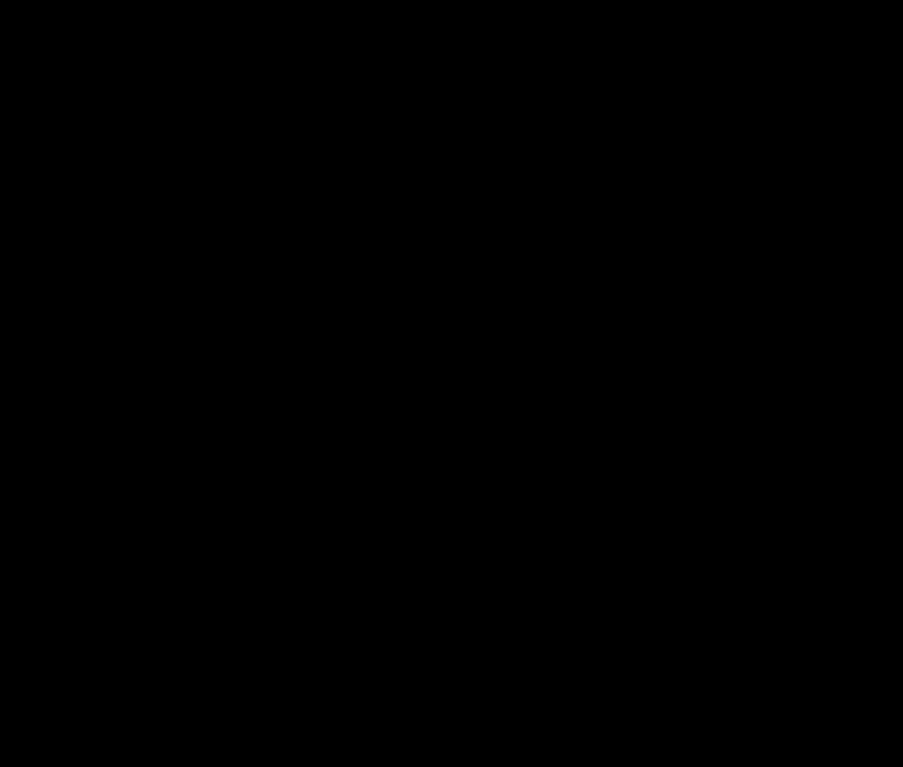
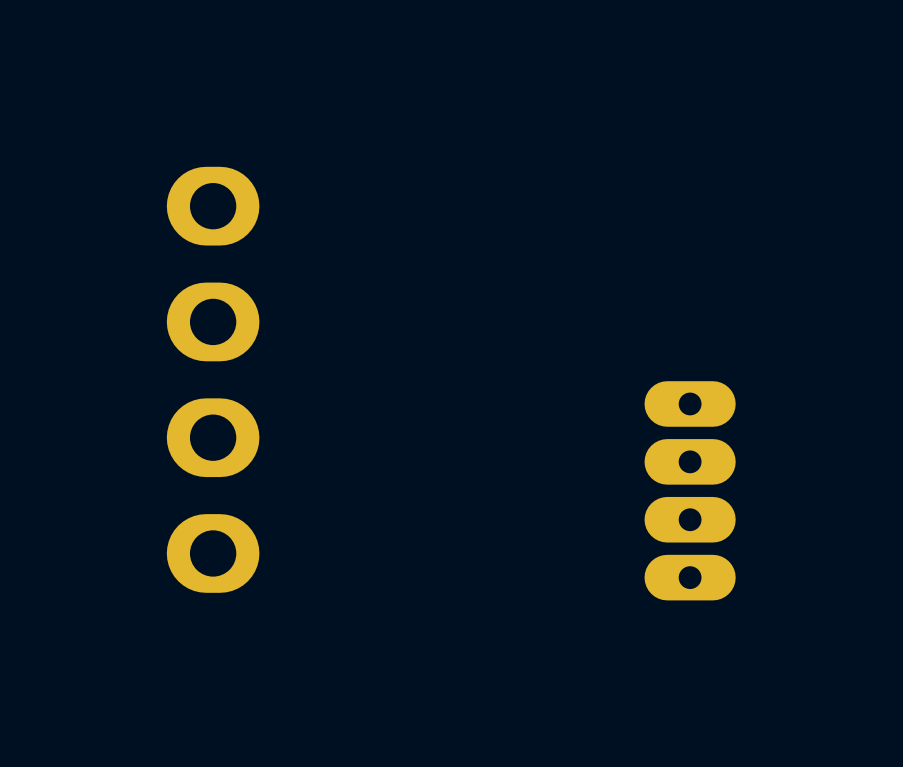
part: none -> (213, 379)
part: none -> (690, 490)

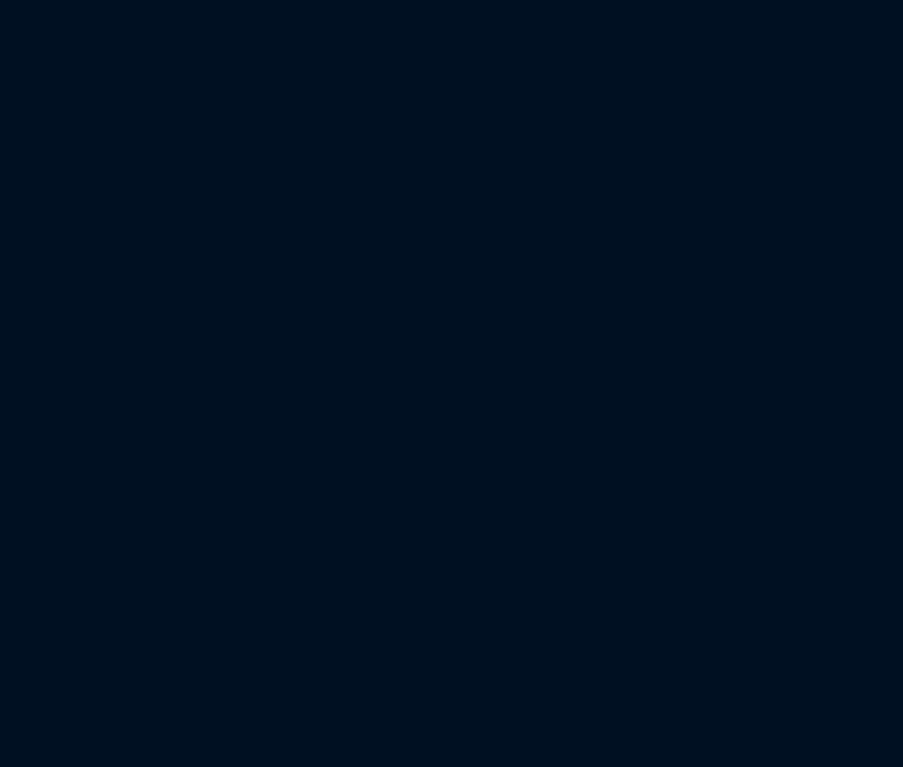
part: (213, 379) -> none
part: (690, 490) -> none

